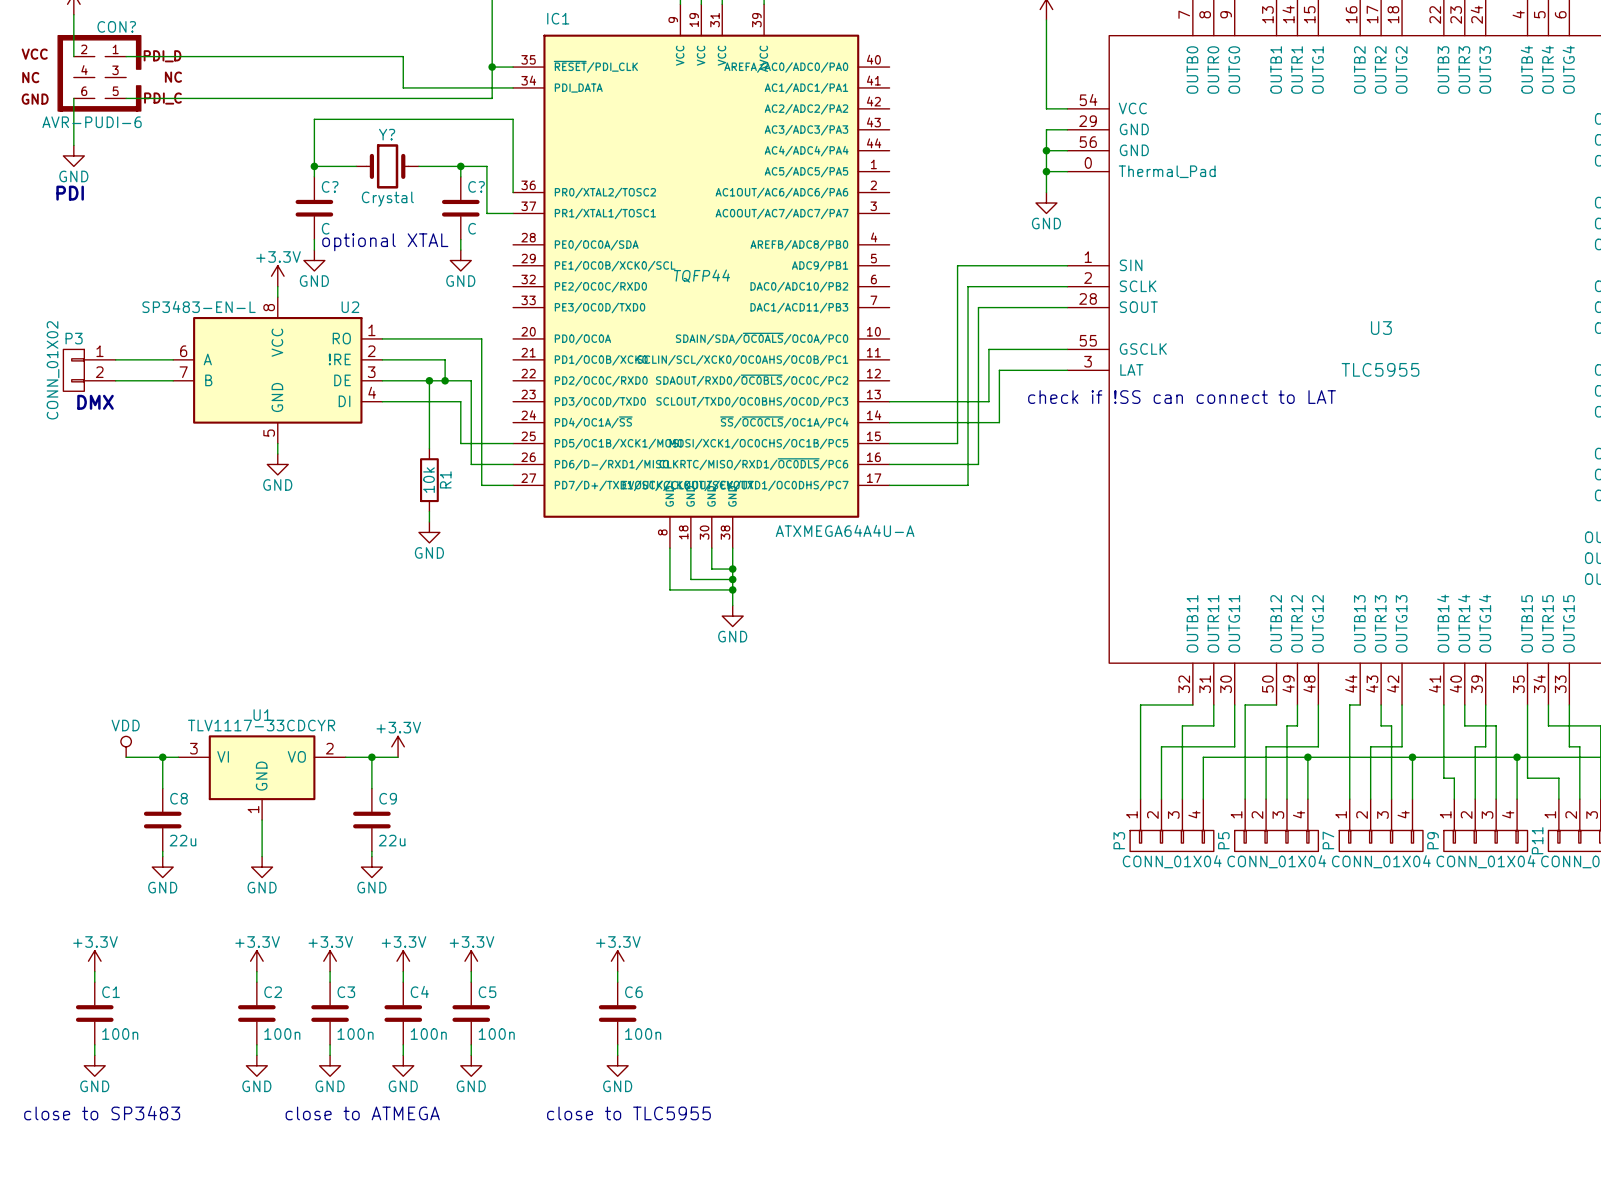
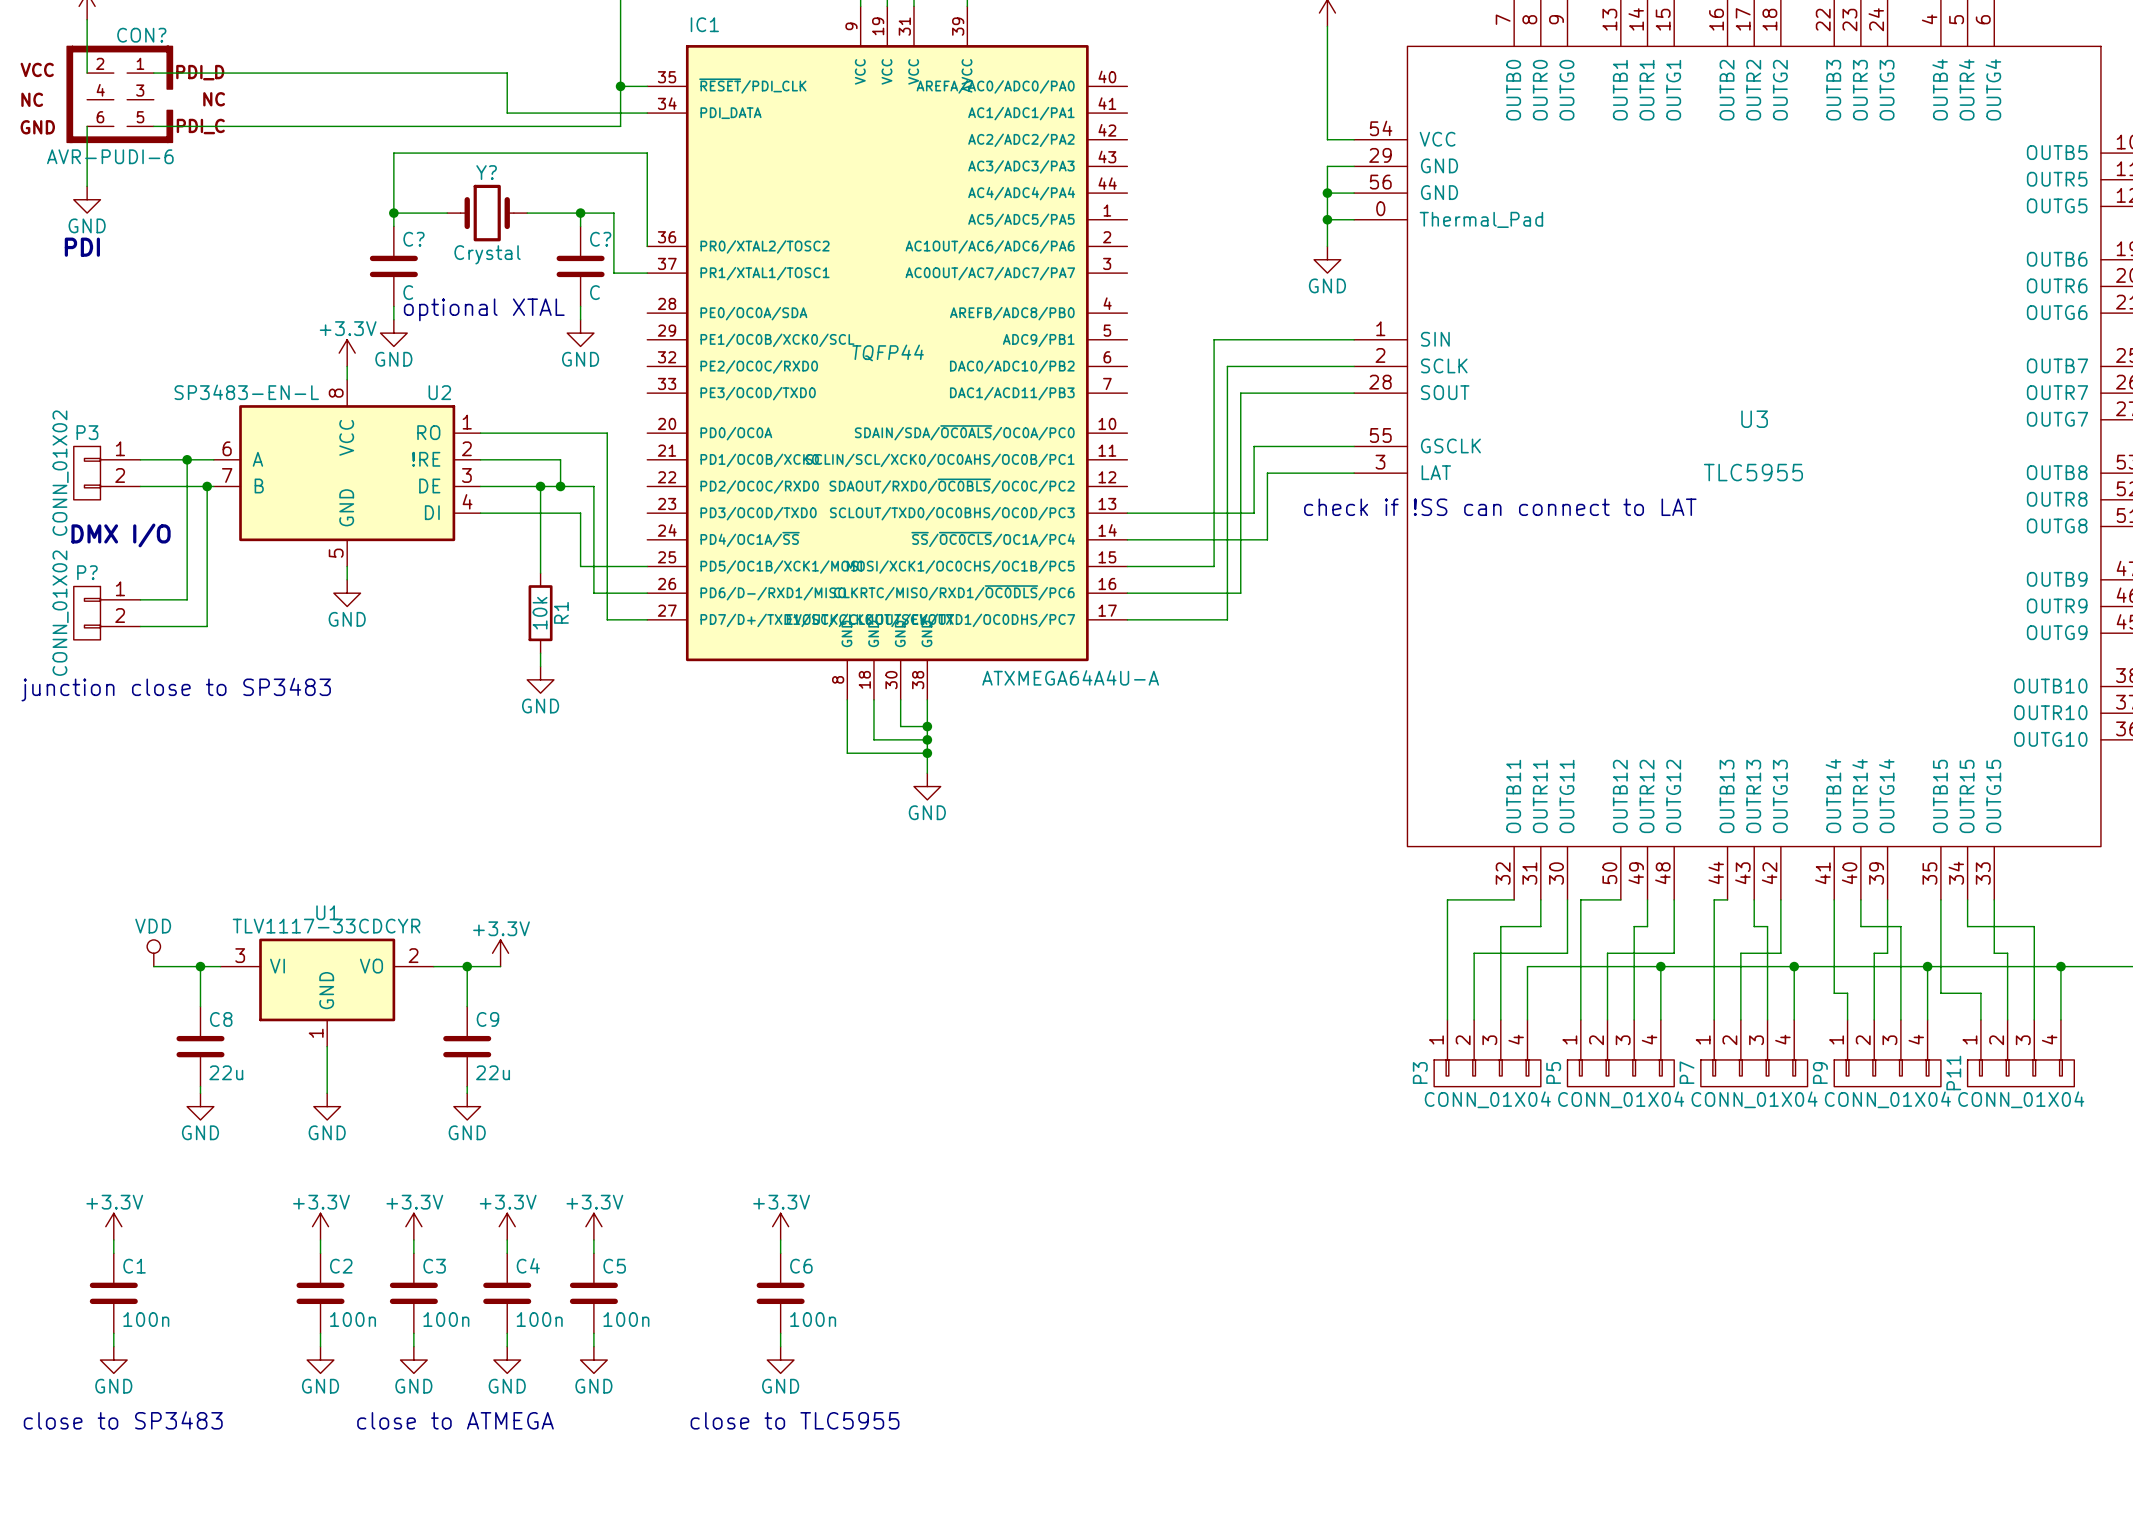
wire: none -> (187, 459) (187, 599) (140, 599)
junction: none -> (187, 459)
wire: none -> (207, 486) (207, 626) (140, 626)
junction: none -> (207, 486)
text: DMX (95, 402) -> none
text: none -> DMX I/O (121, 535)
P?: none -> CONN_01X02 (107, 613)
text: none -> junction close to SP3483 (176, 689)

